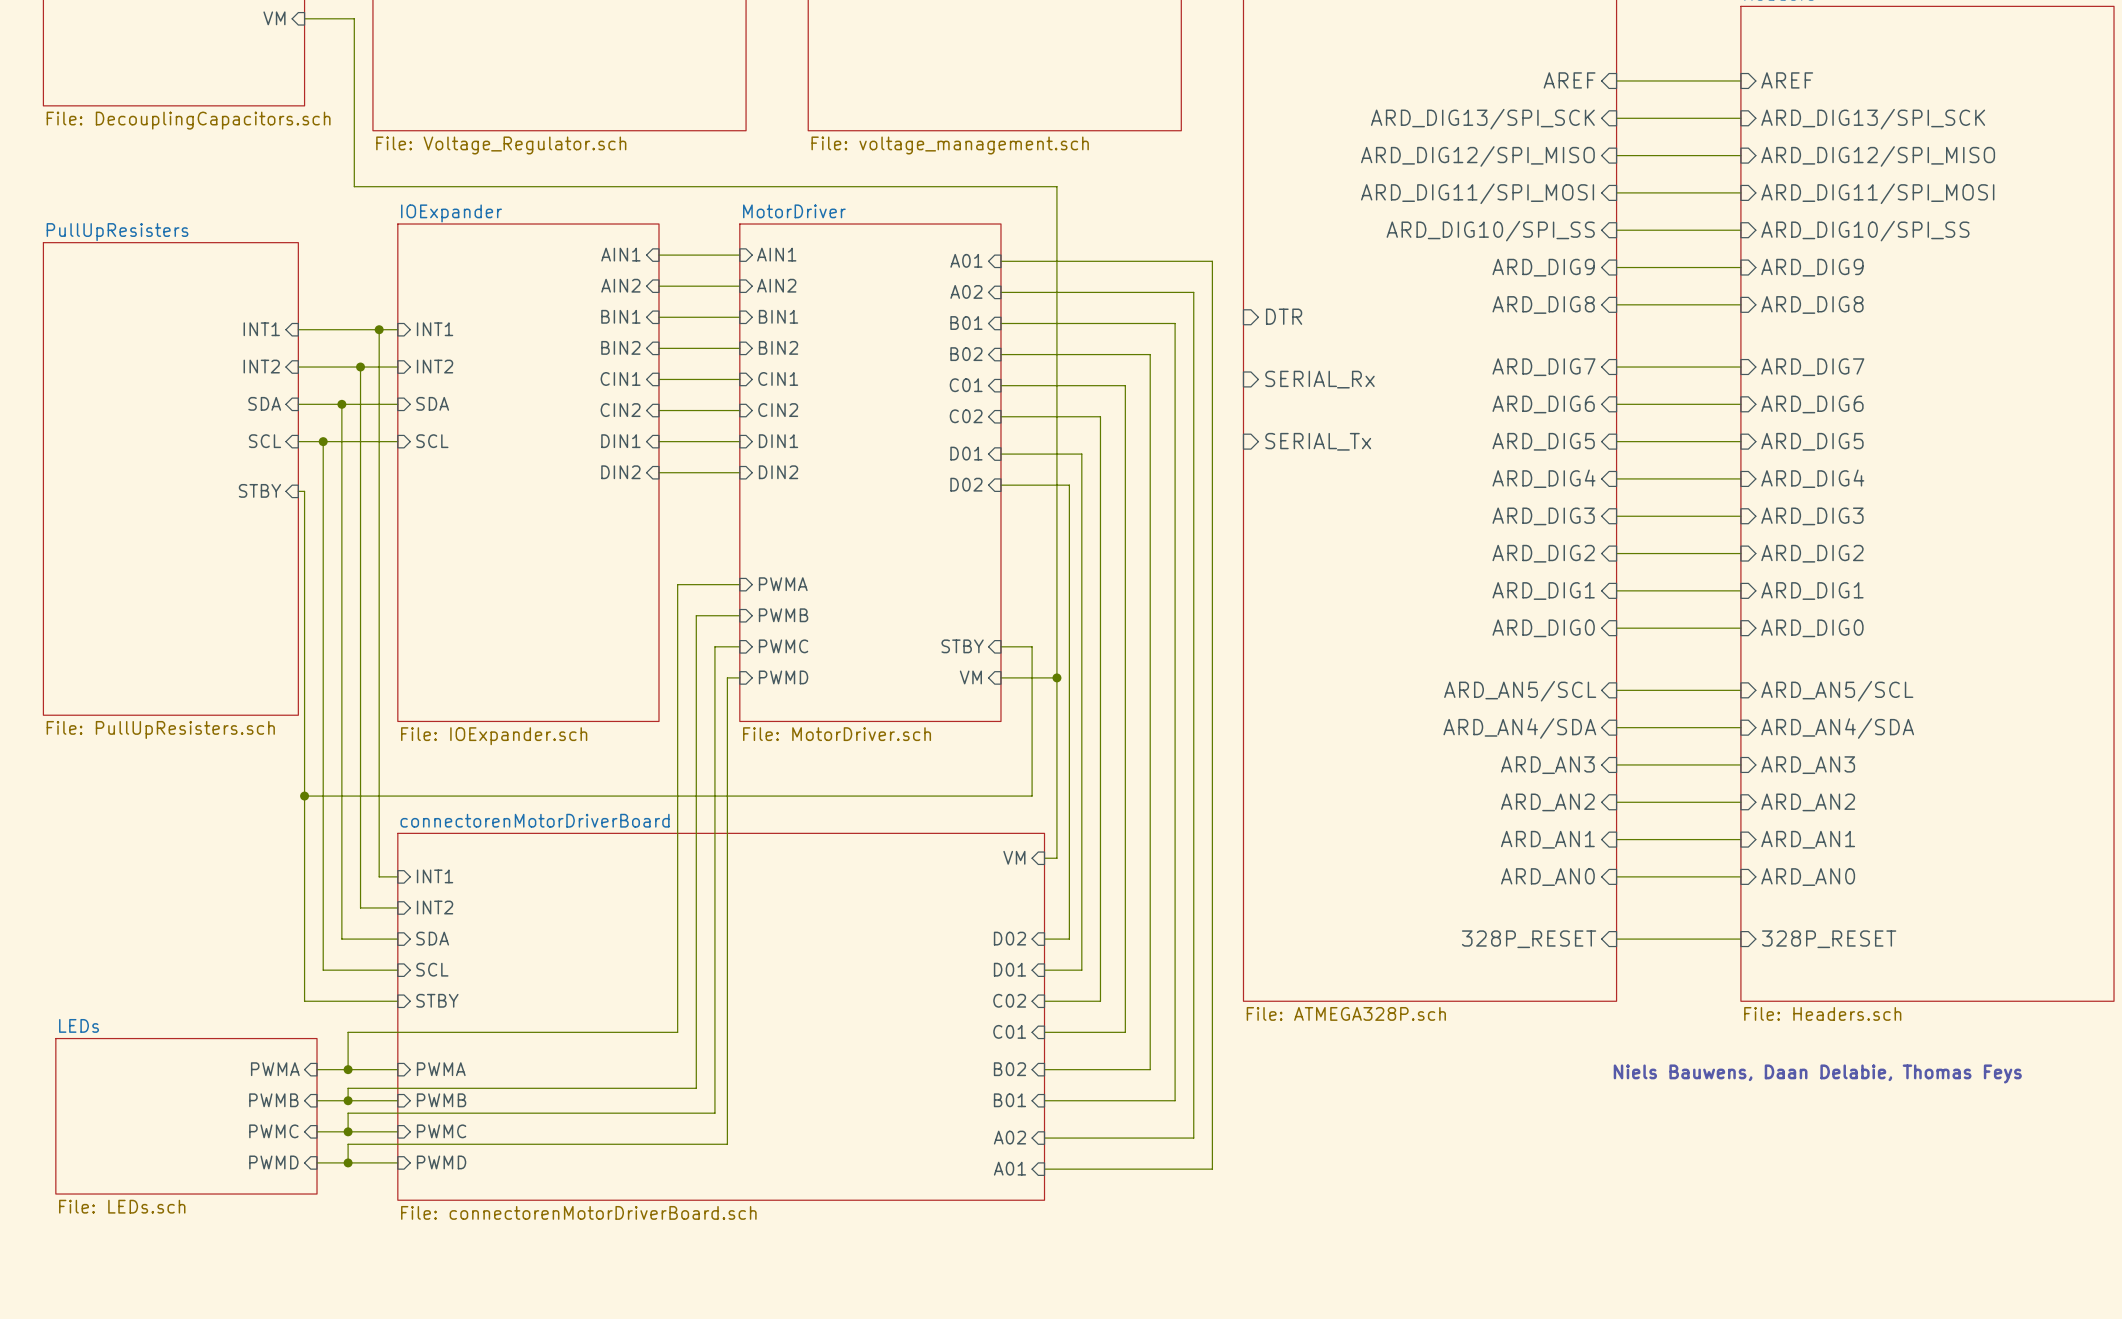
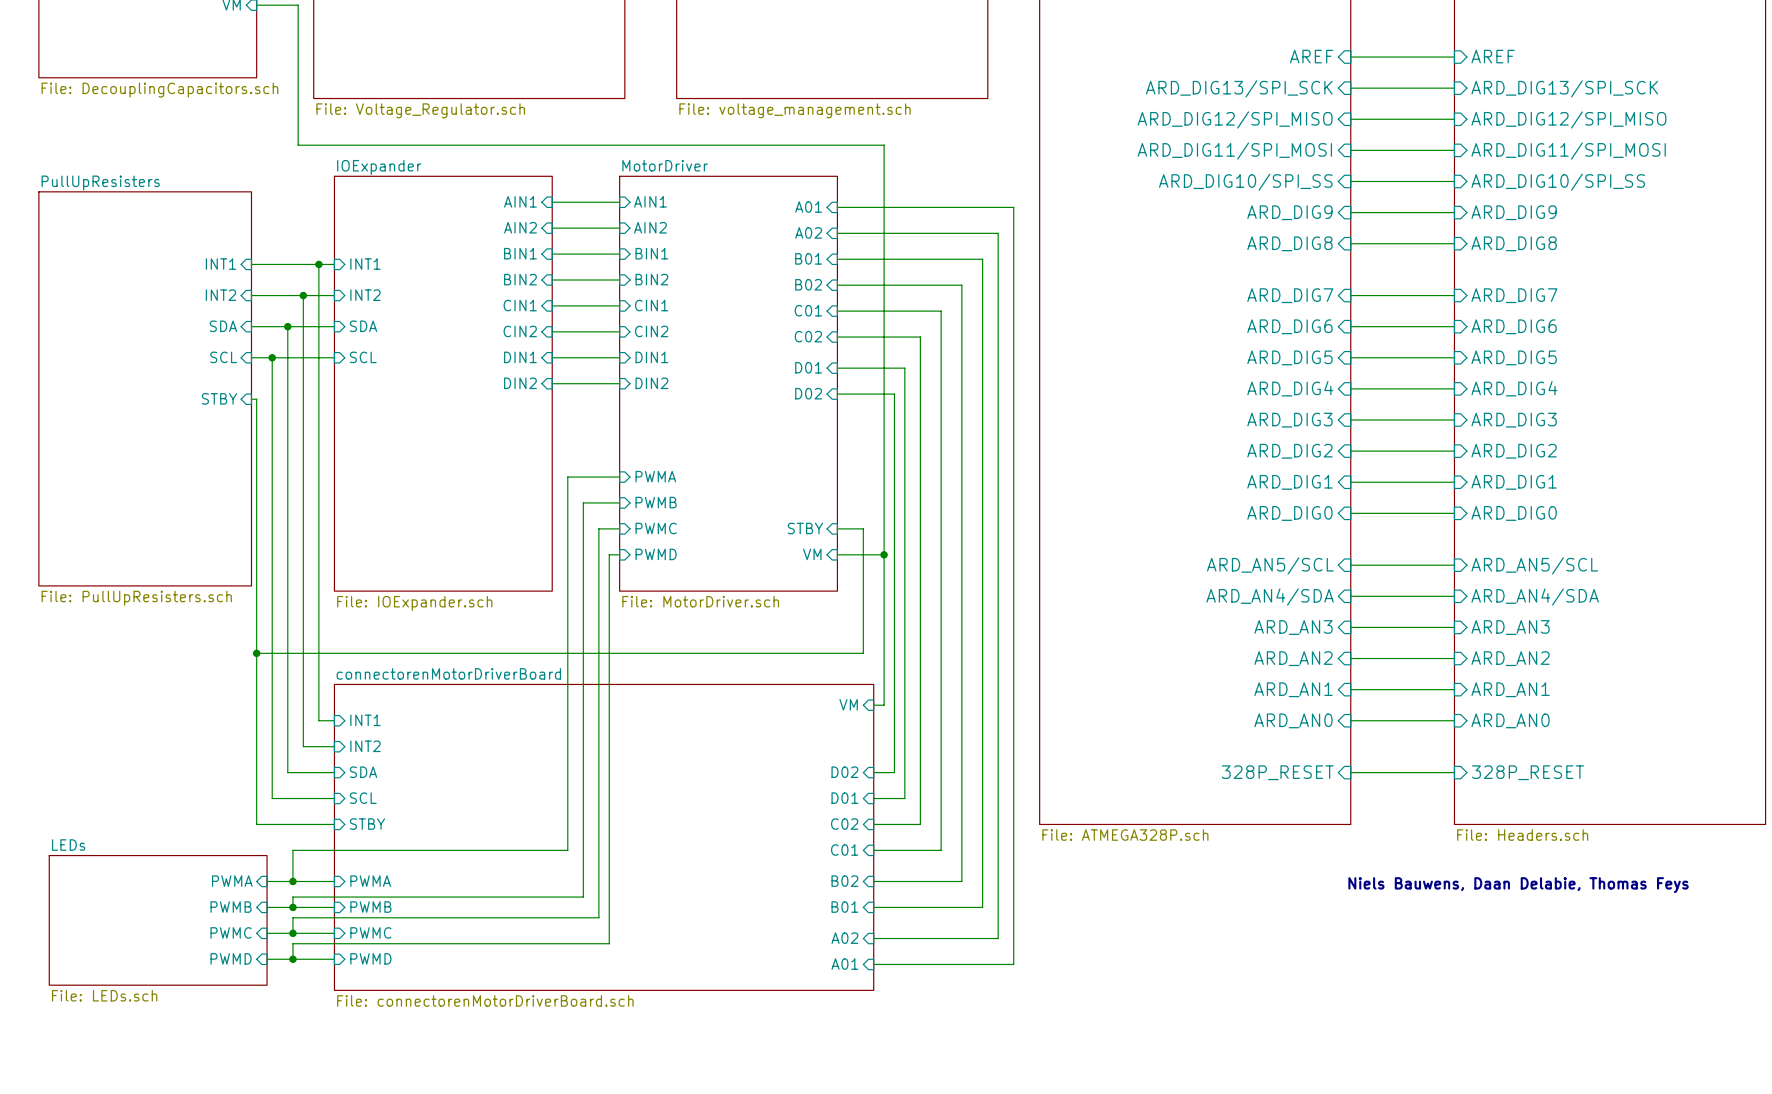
sheet pin: DTR (1284, 316) -> none
sheet pin: SERIAL_Rx (1319, 379) -> none
sheet pin: SERIAL_Tx (1318, 441) -> none

